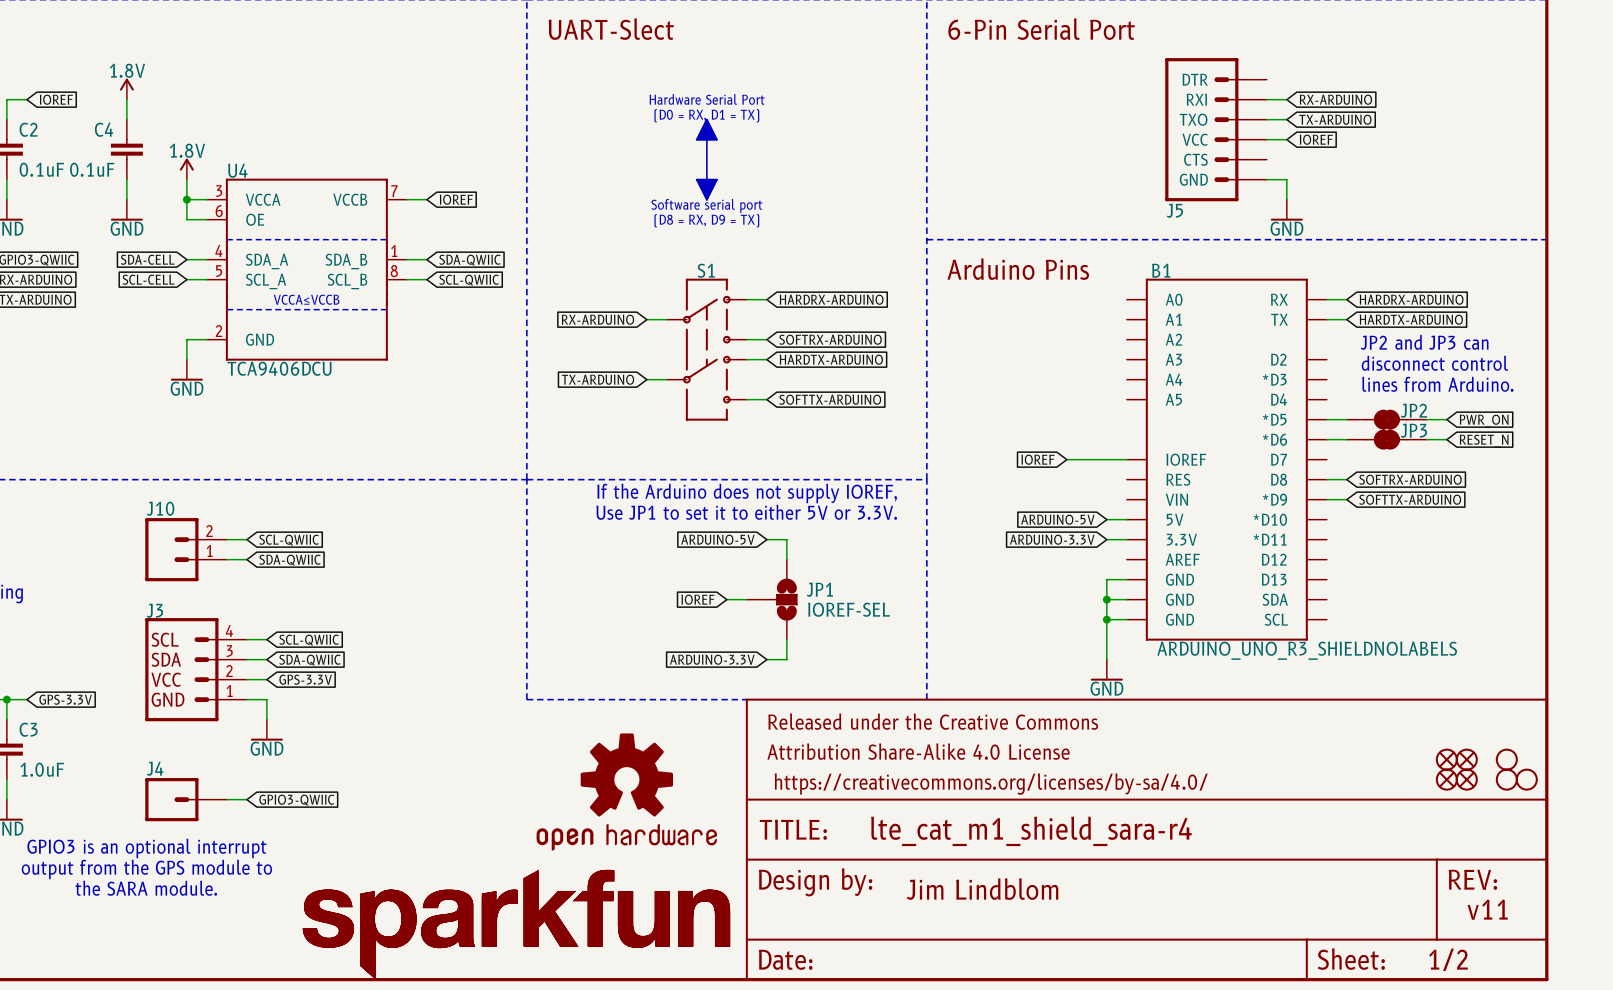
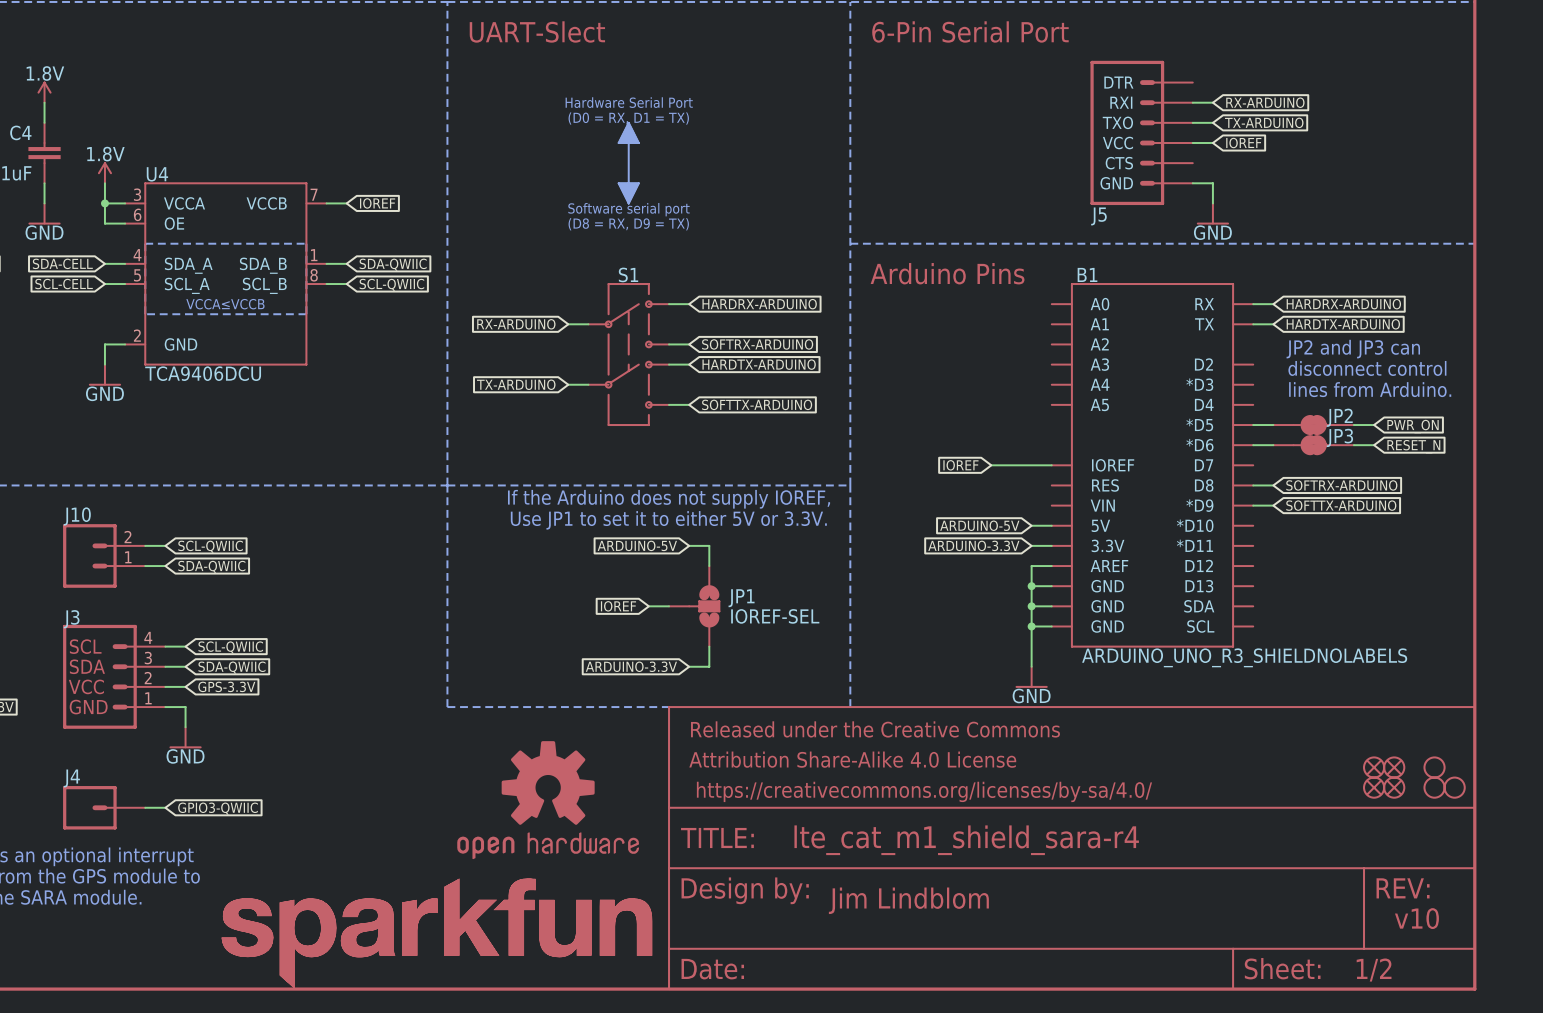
wire: none -> (1051, 566) (1031, 566) (1031, 586)
junction: none -> (1031, 586)
text: v11 (1487, 909) -> v10 (1416, 918)

